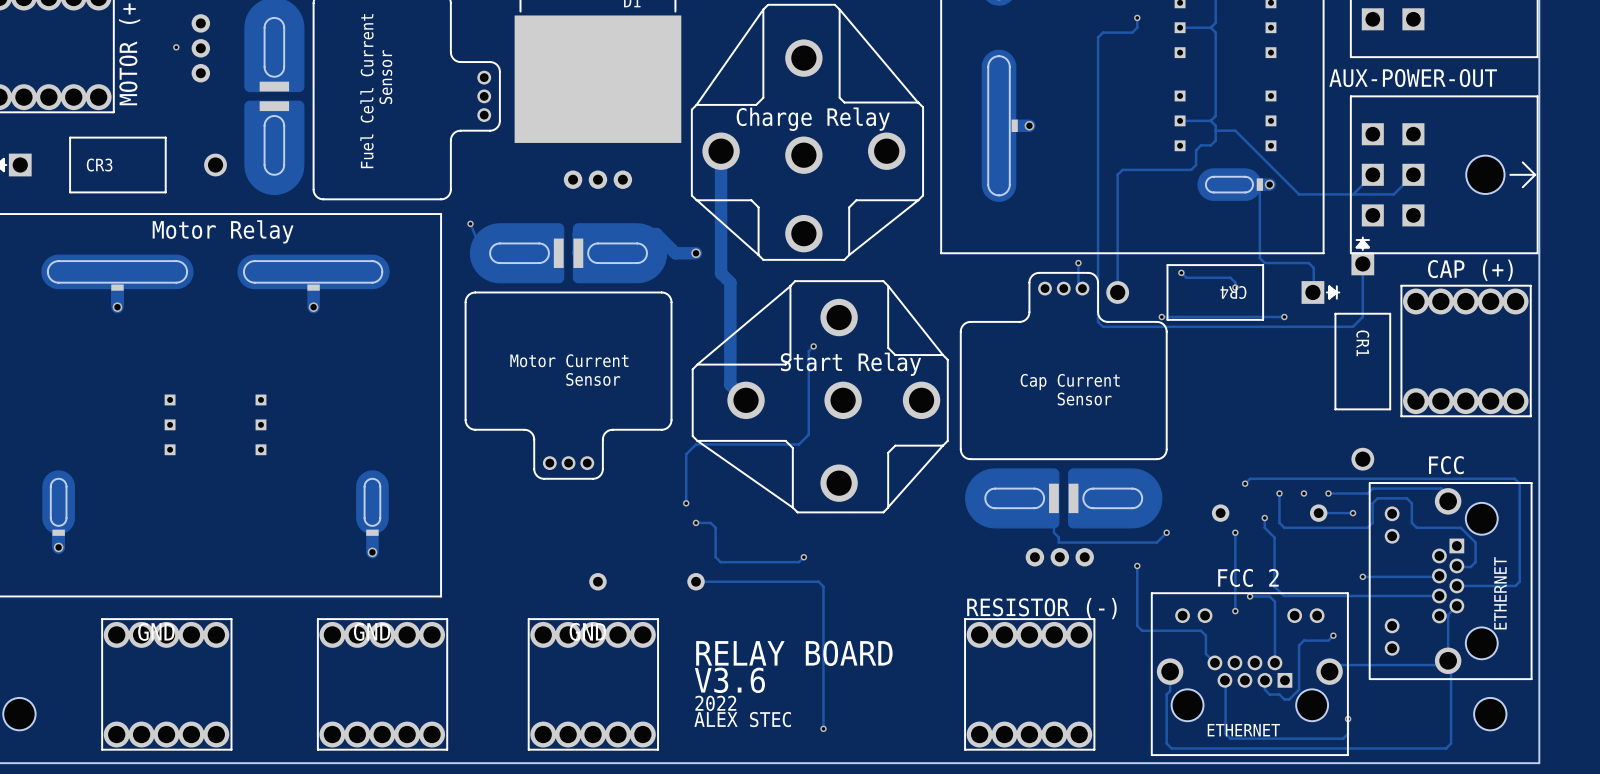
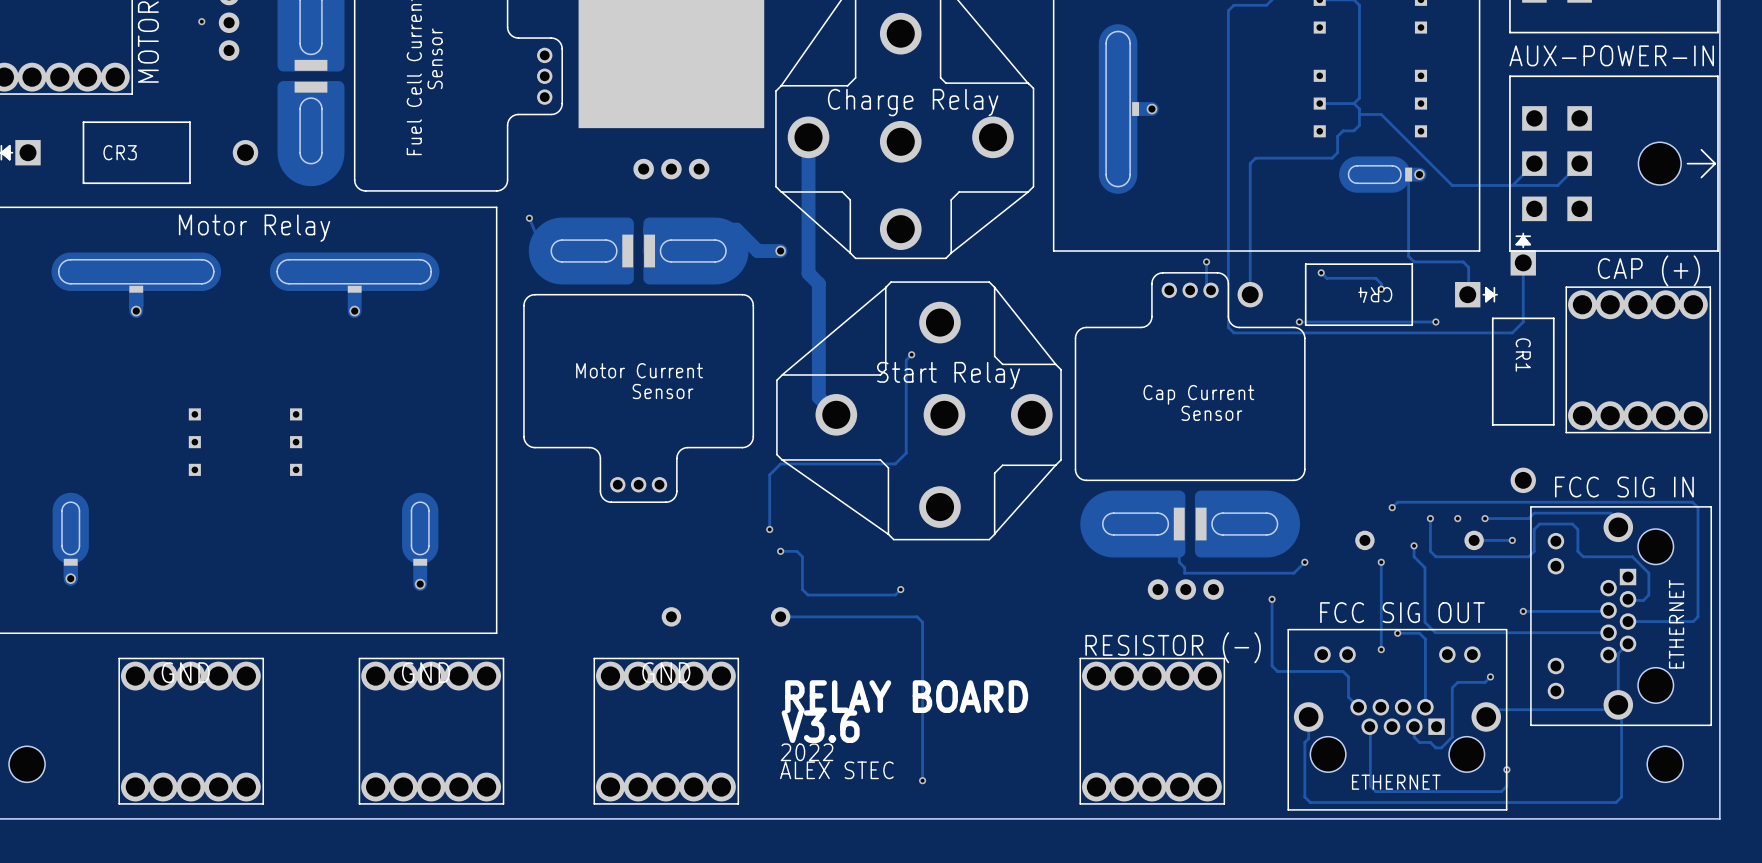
AUX-POWER-OUT name: AUX-POWER-OUT (1413, 78) -> AUX-POWER-IN (1611, 55)
text: FCC (1446, 465) -> none
text: none -> FCC SIG IN (1624, 487)
text: FCC 2 (1248, 577) -> none
text: none -> FCC SIG OUT (1402, 612)

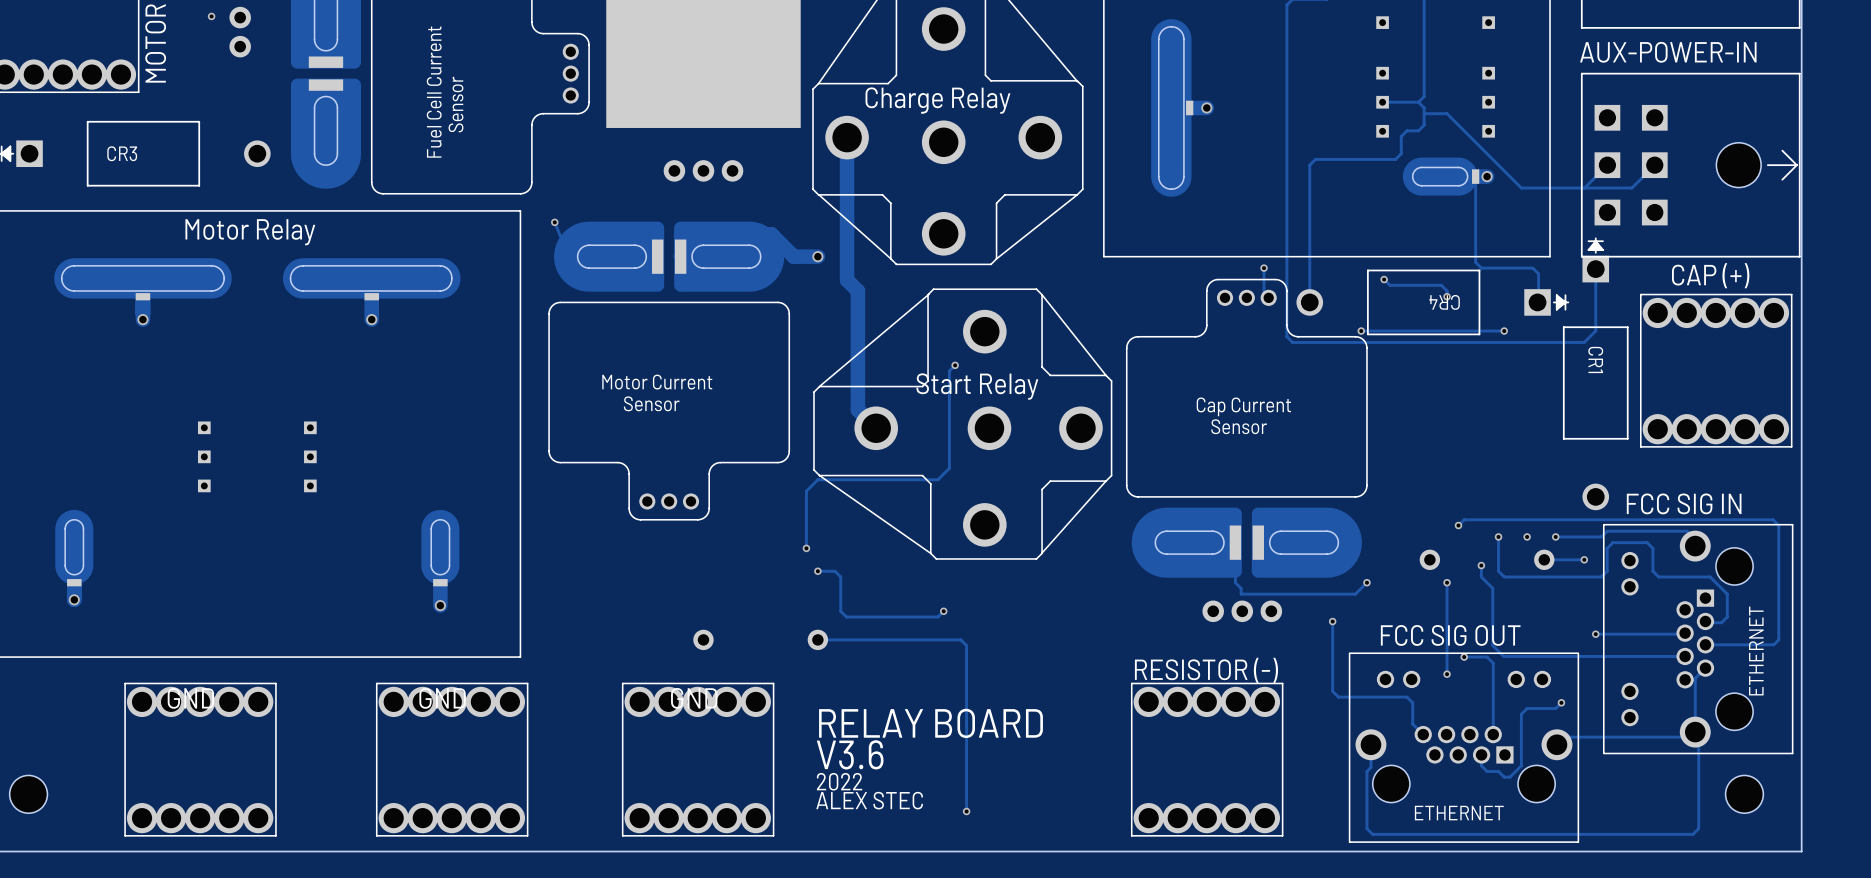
track: (1369, 726) (1370, 786) (1375, 791) (1501, 791) (1506, 786) (1506, 769) -> none
via: (1506, 769) -> none

